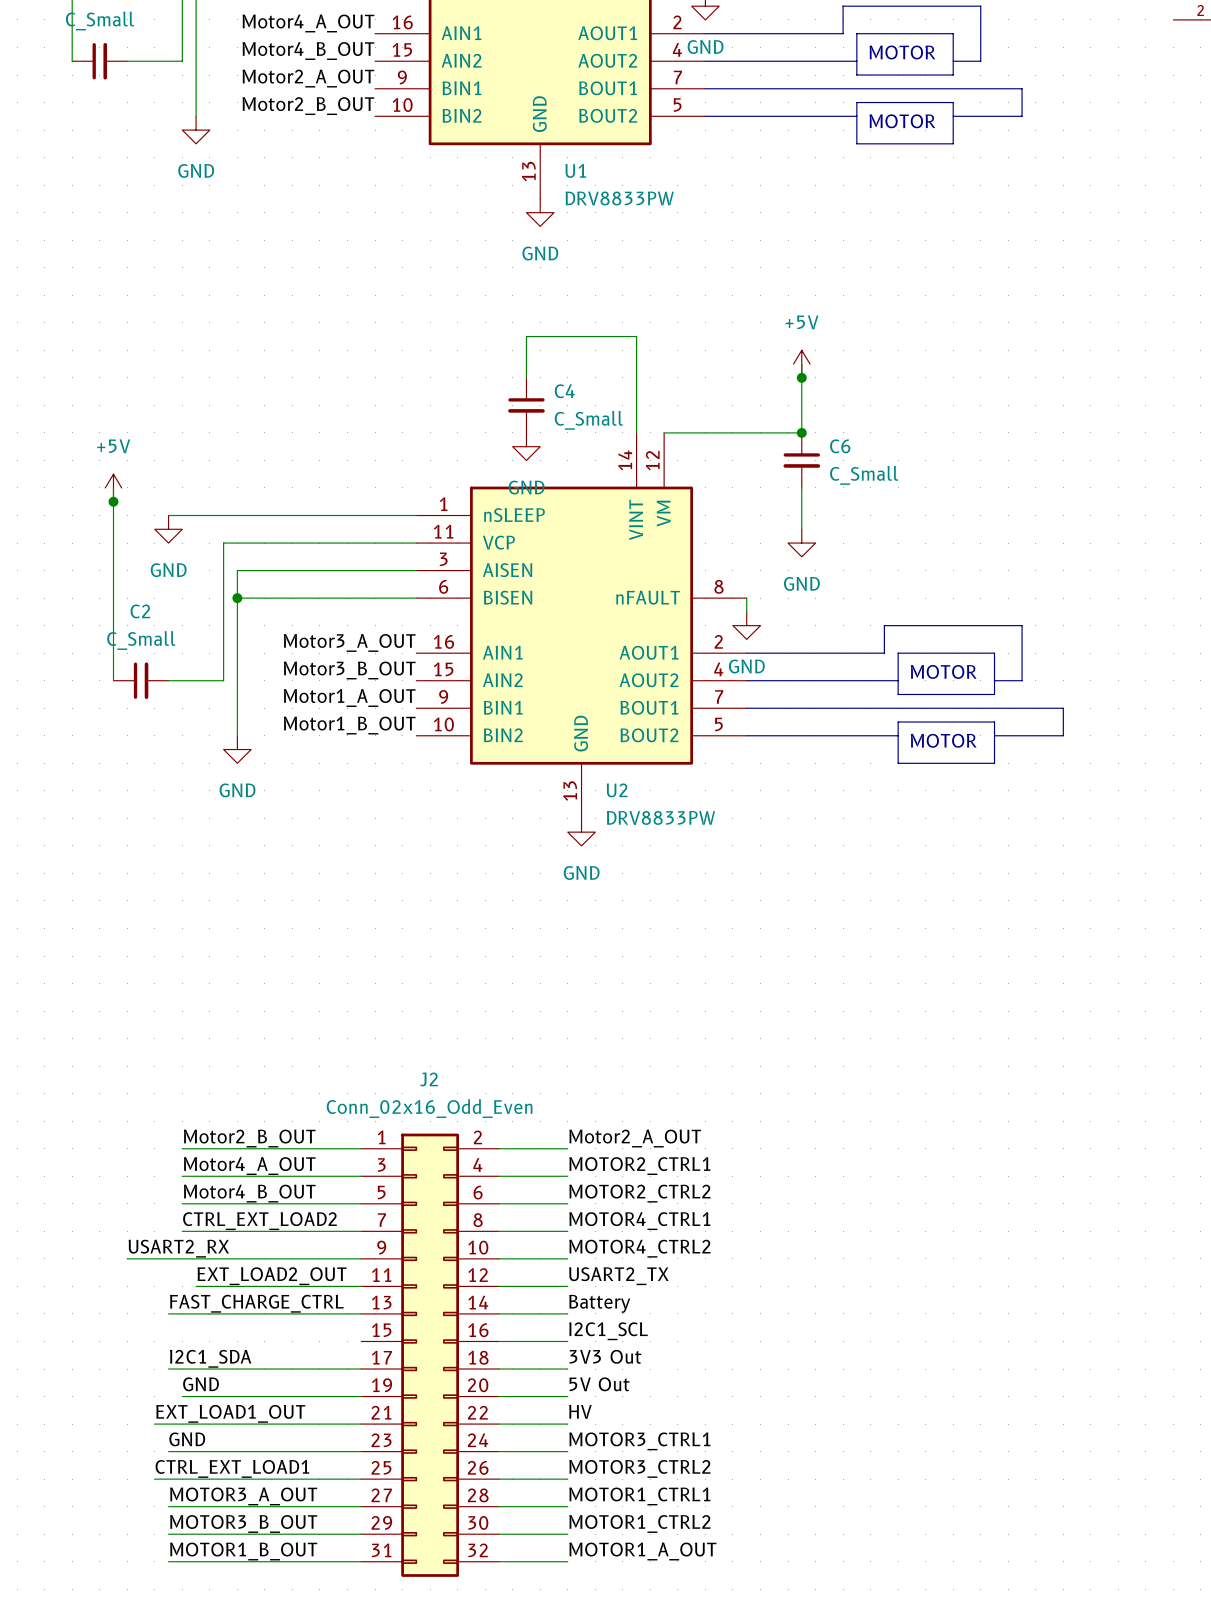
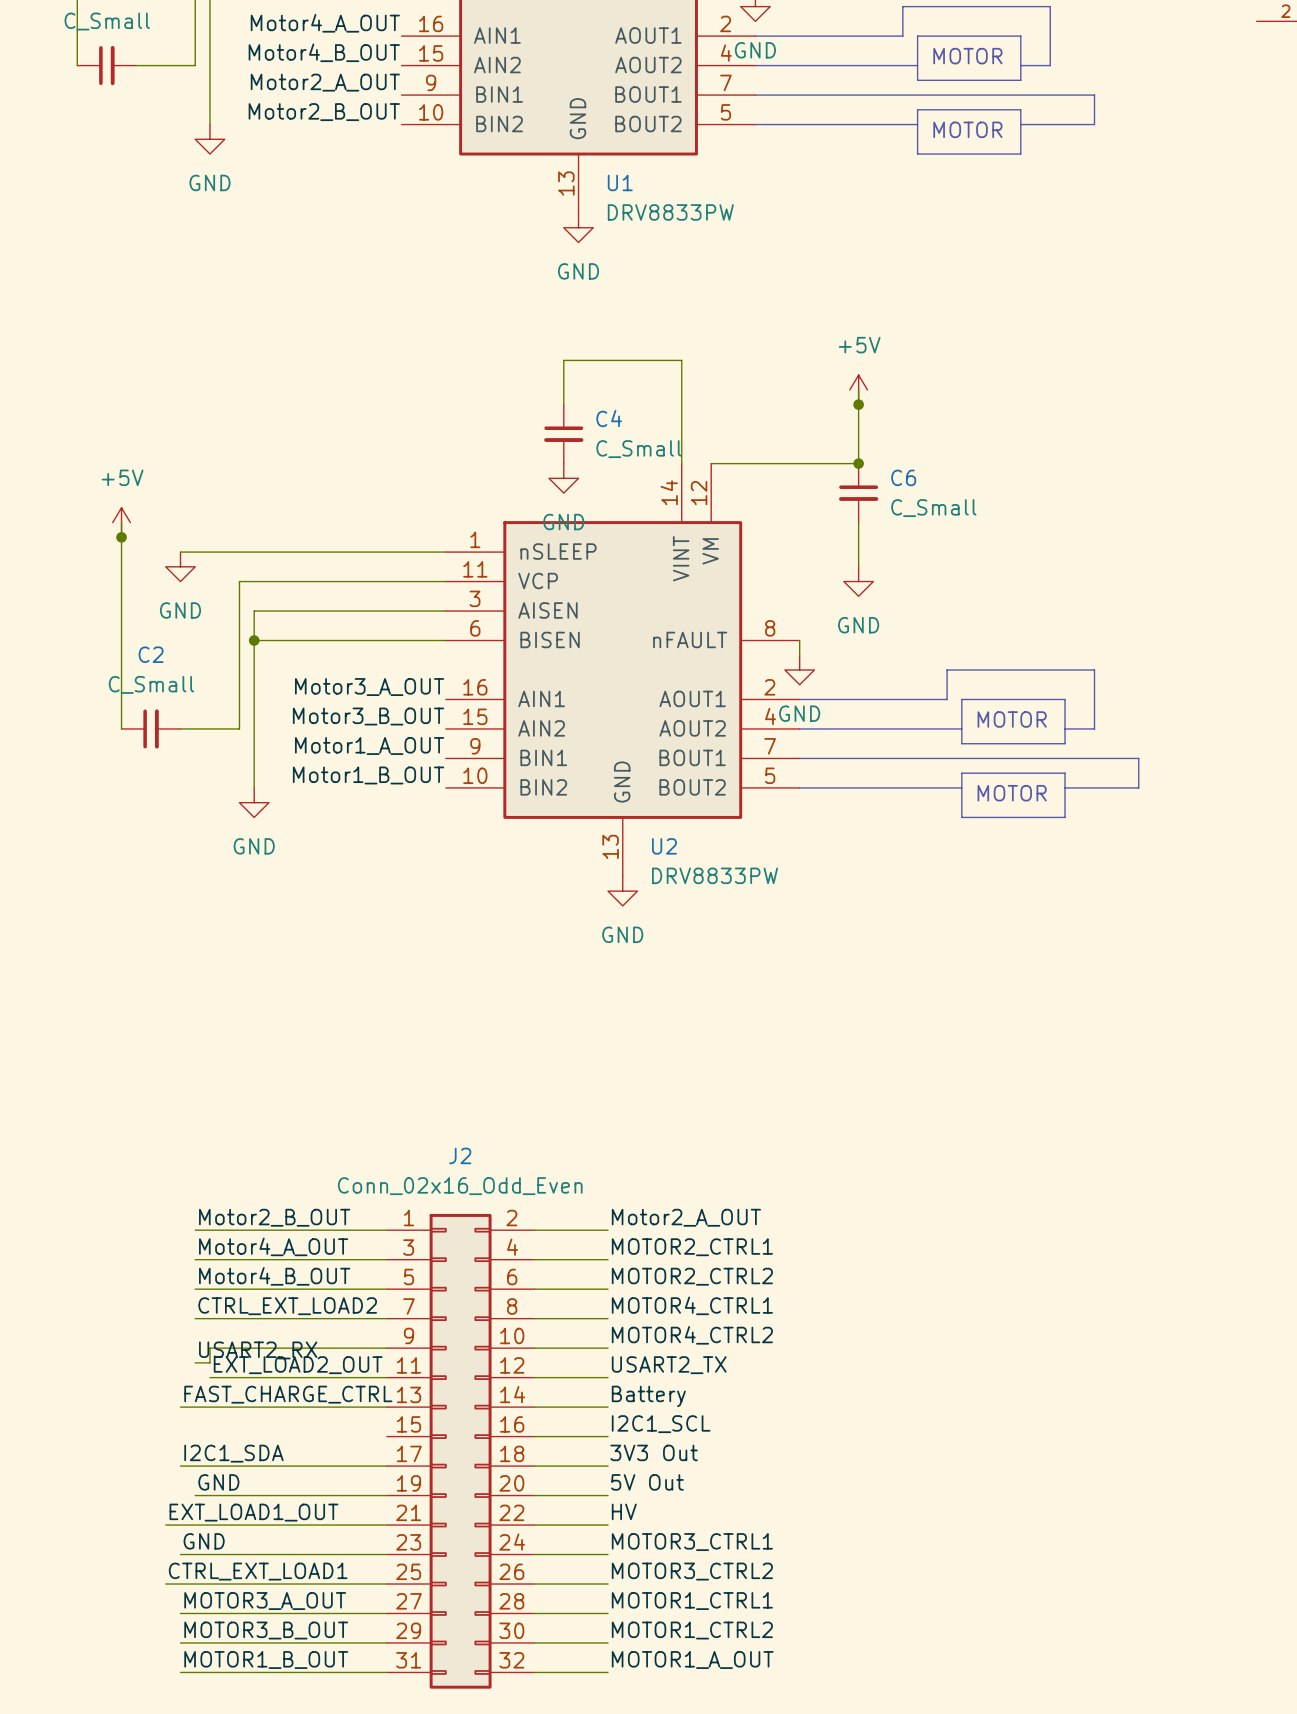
label position: USART2_RX (178, 1248) -> USART2_RX (258, 1350)
wire: (127, 1258) (196, 1258) -> (195, 1362) (209, 1362) (209, 1348)

